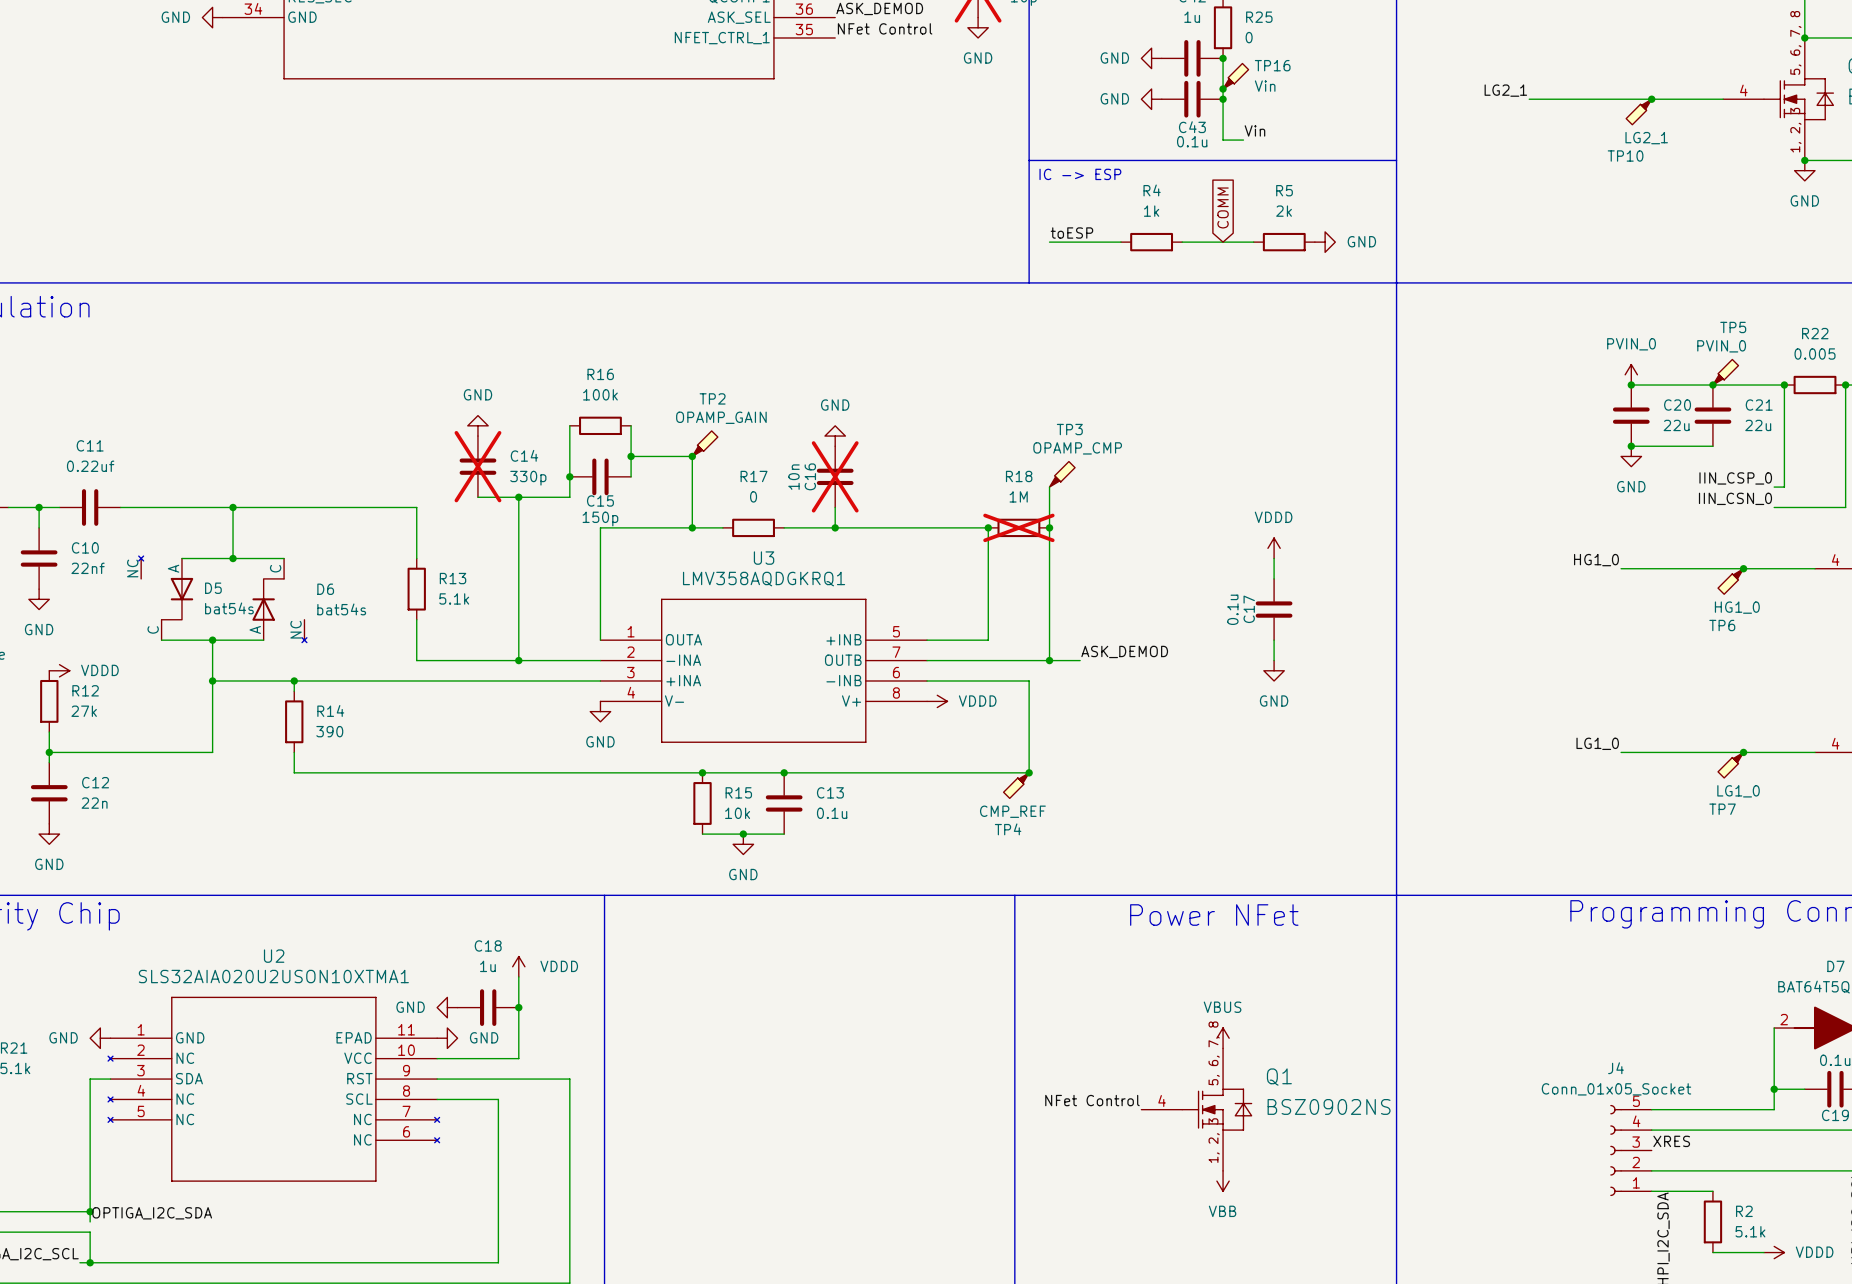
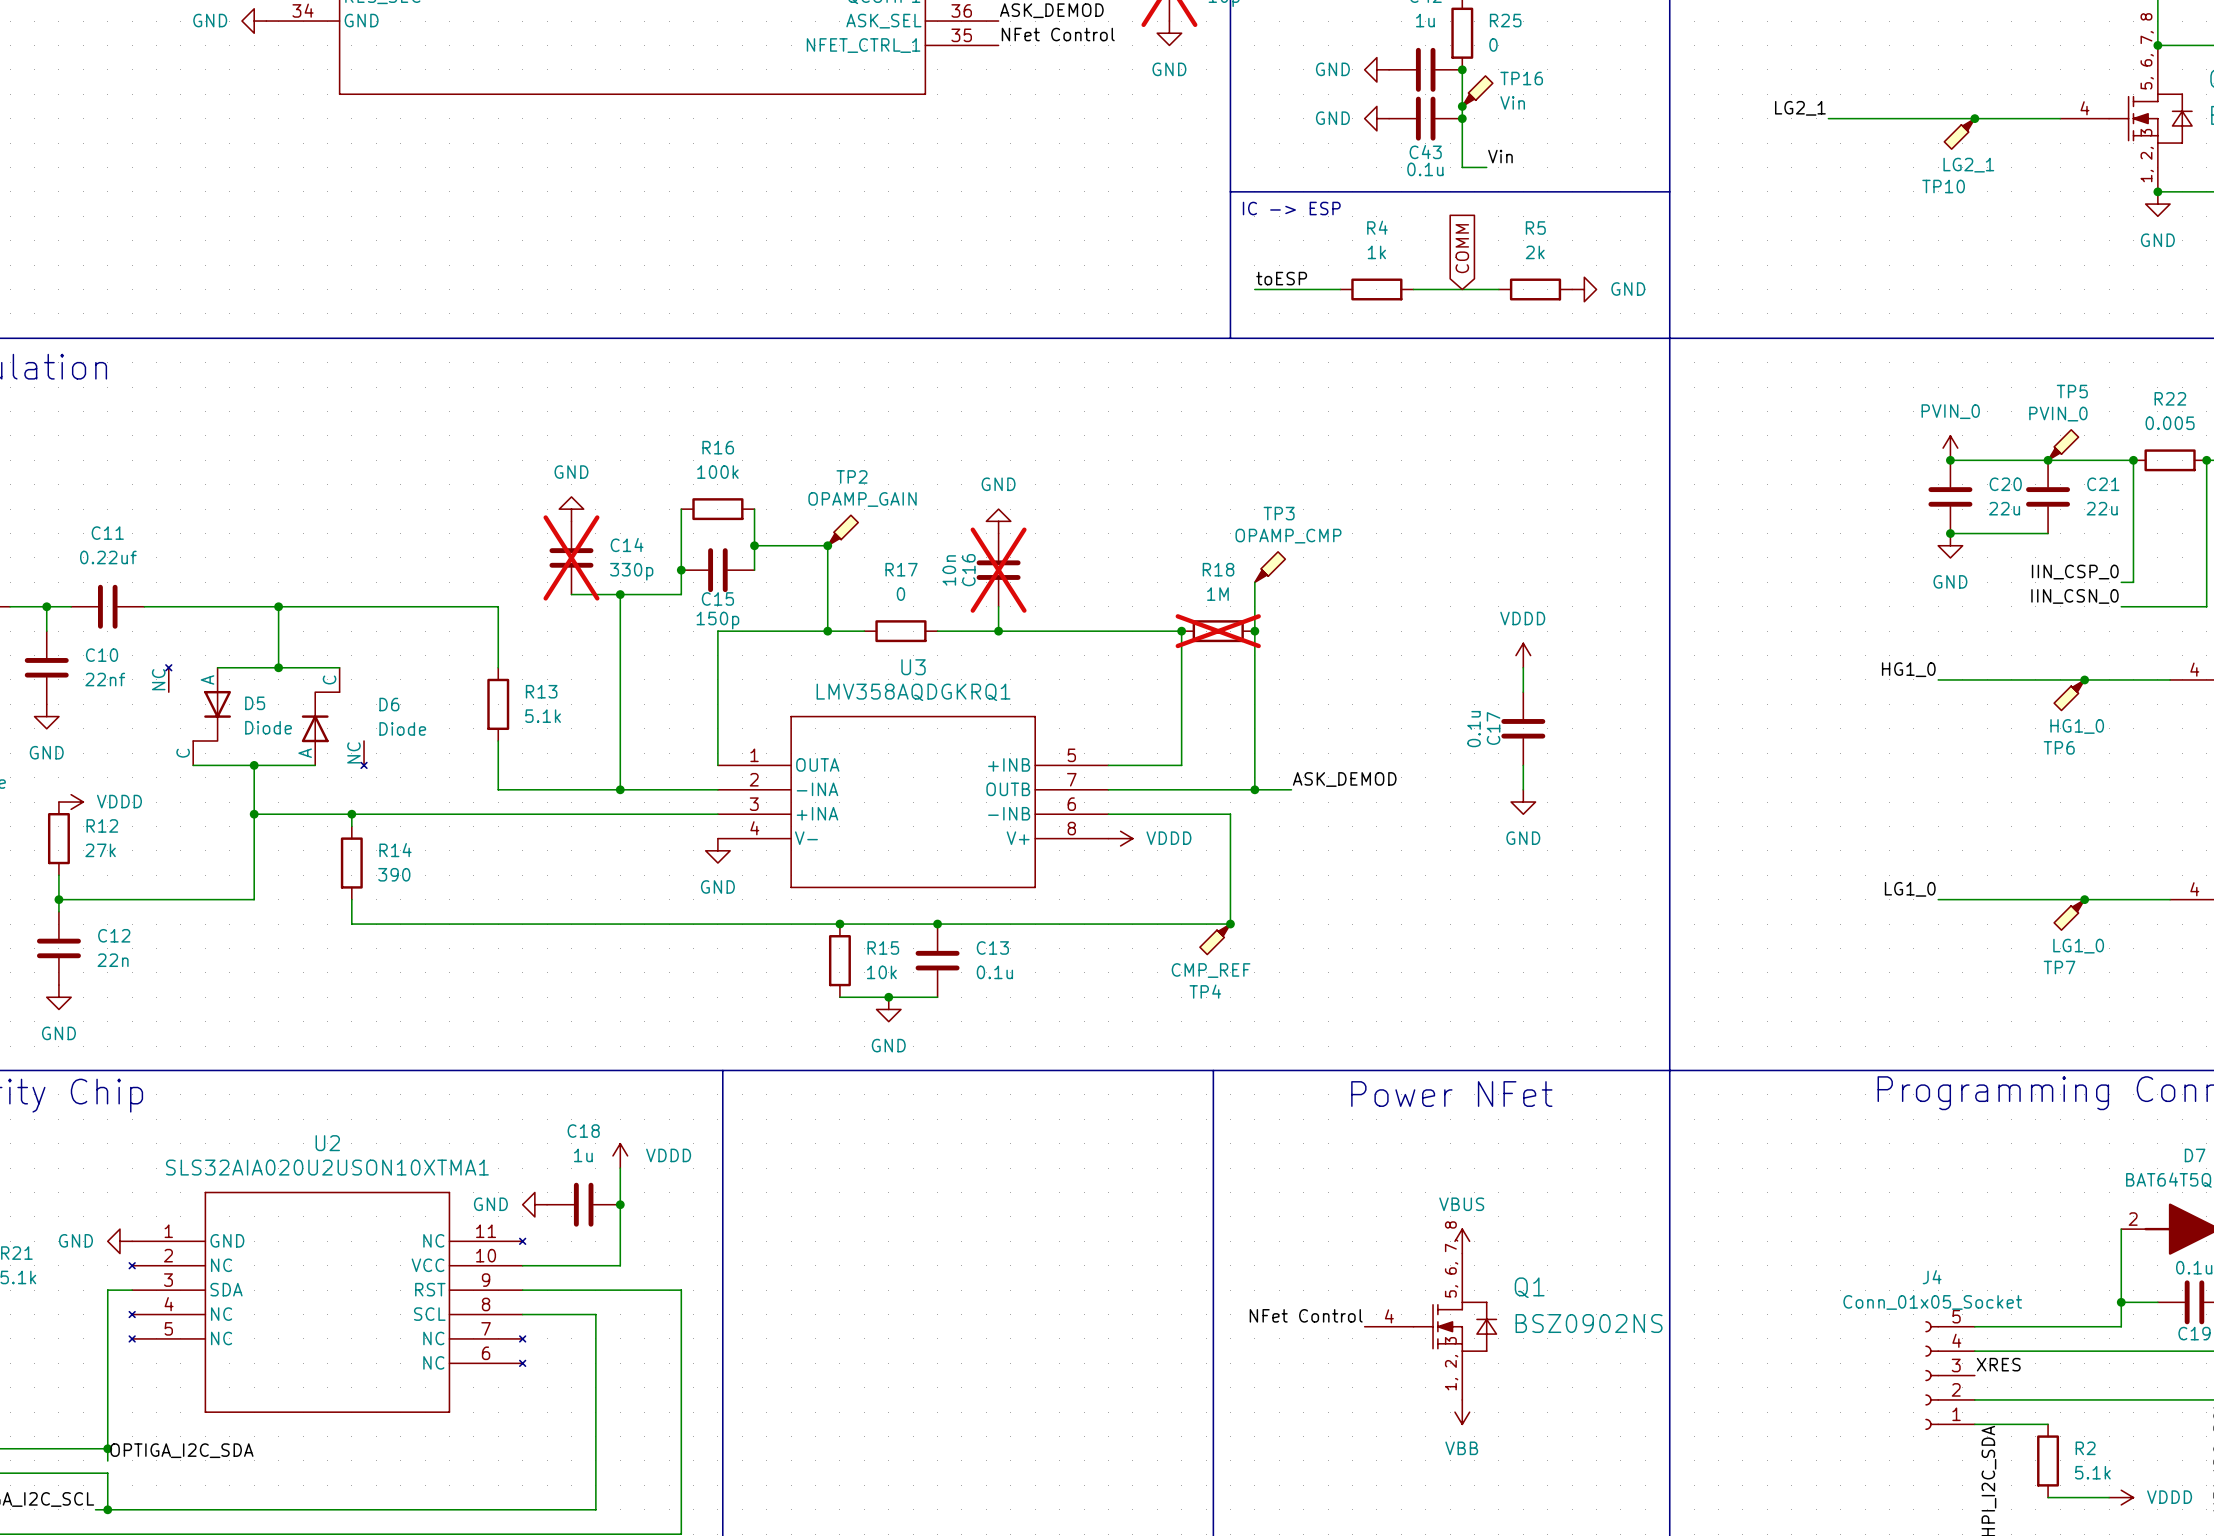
D5 value: bat54s (229, 608) -> Diode (268, 727)
D6 value: bat54s (341, 609) -> Diode (402, 728)
U2 symbol: [108, 996, 440, 1182] -> [129, 1191, 526, 1413]
power symbol: GND (447, 1038) -> none

